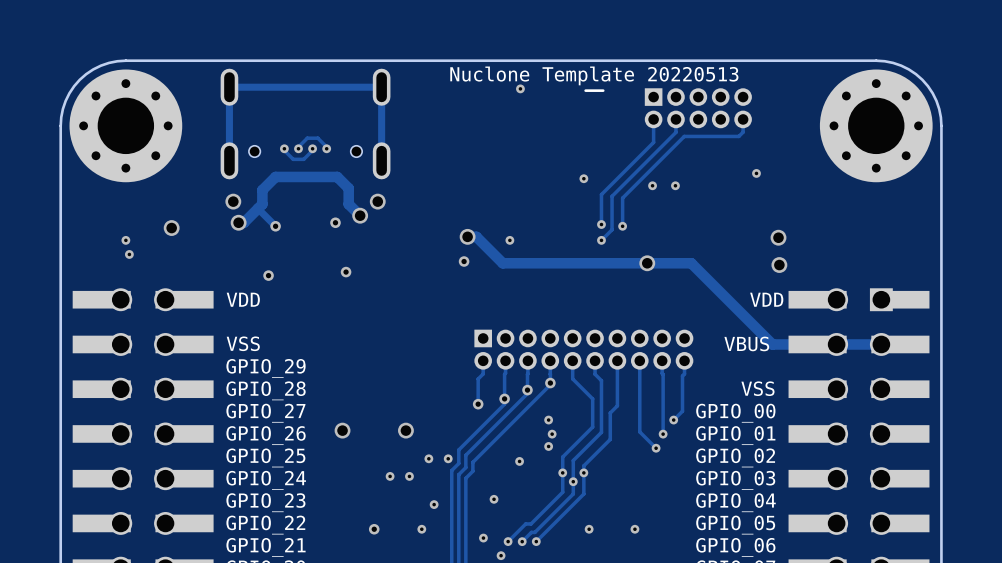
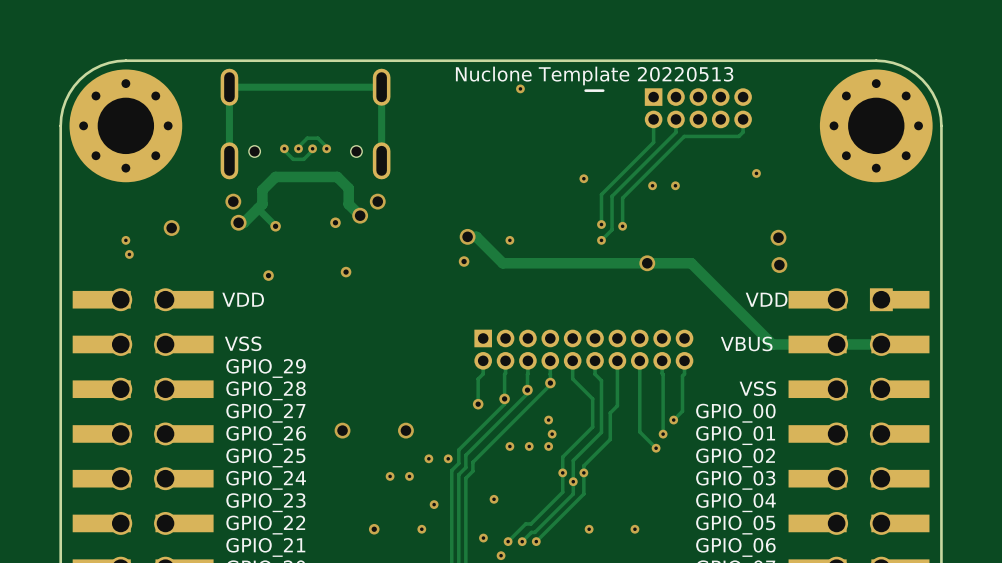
via: none -> (509, 446)
via: none -> (529, 446)
via: (519, 461) -> none

